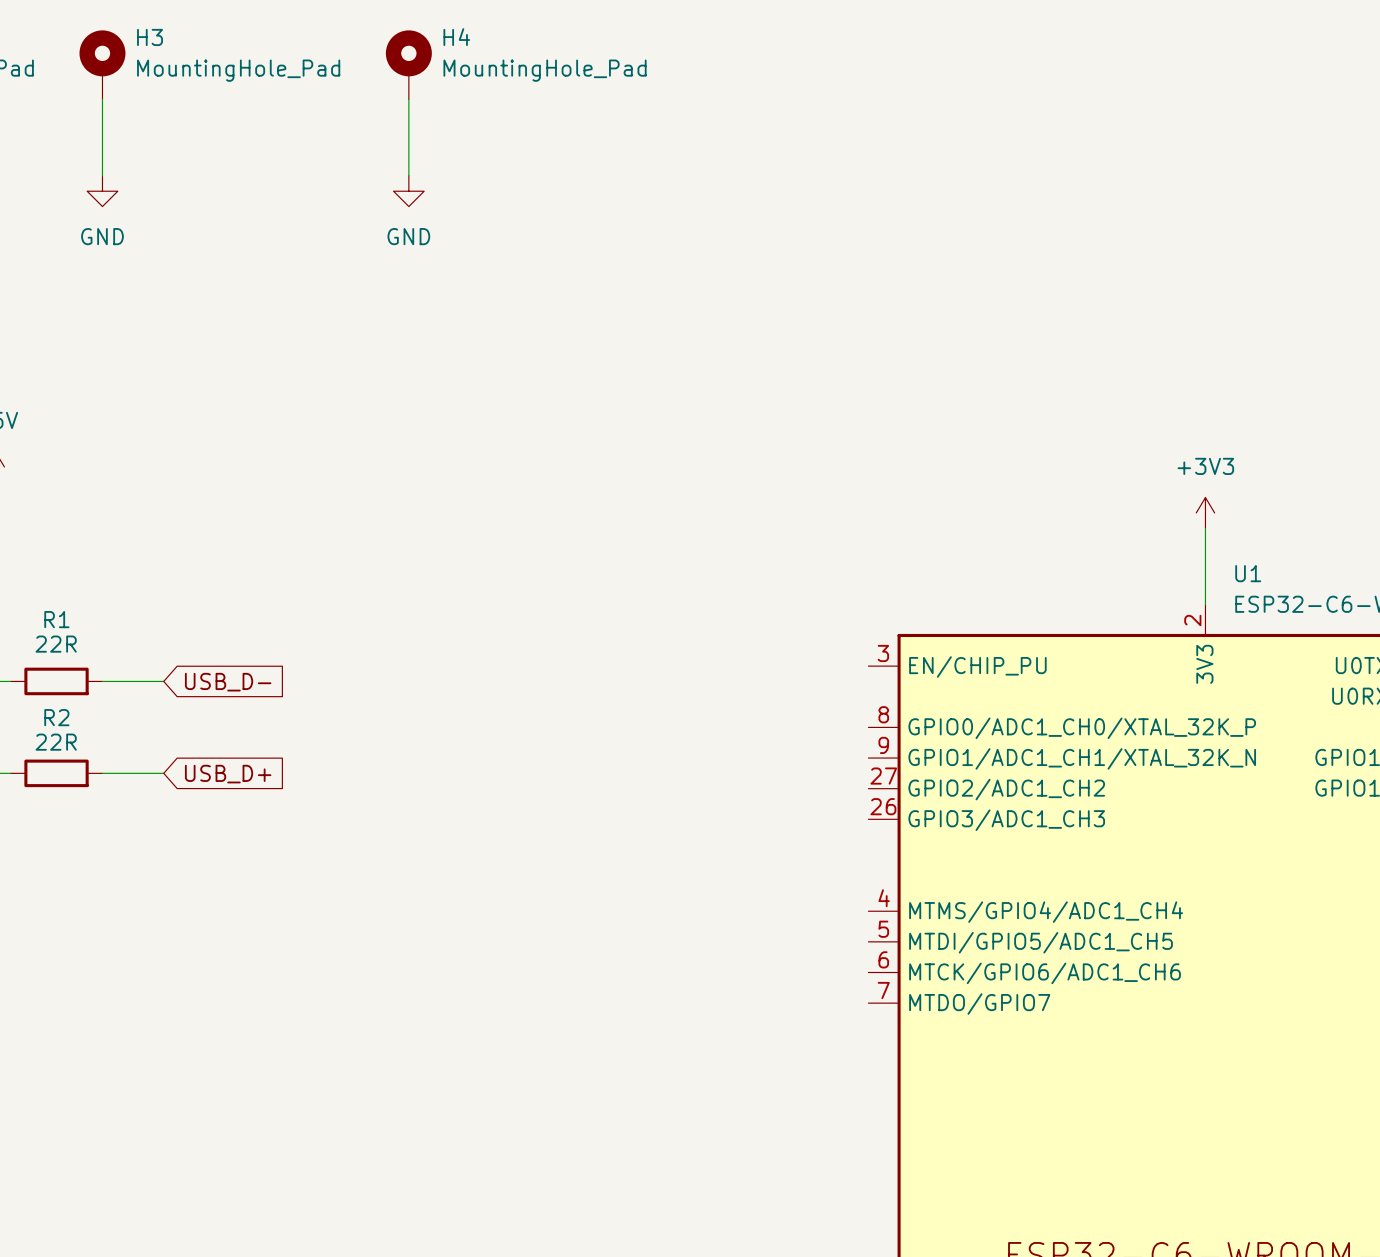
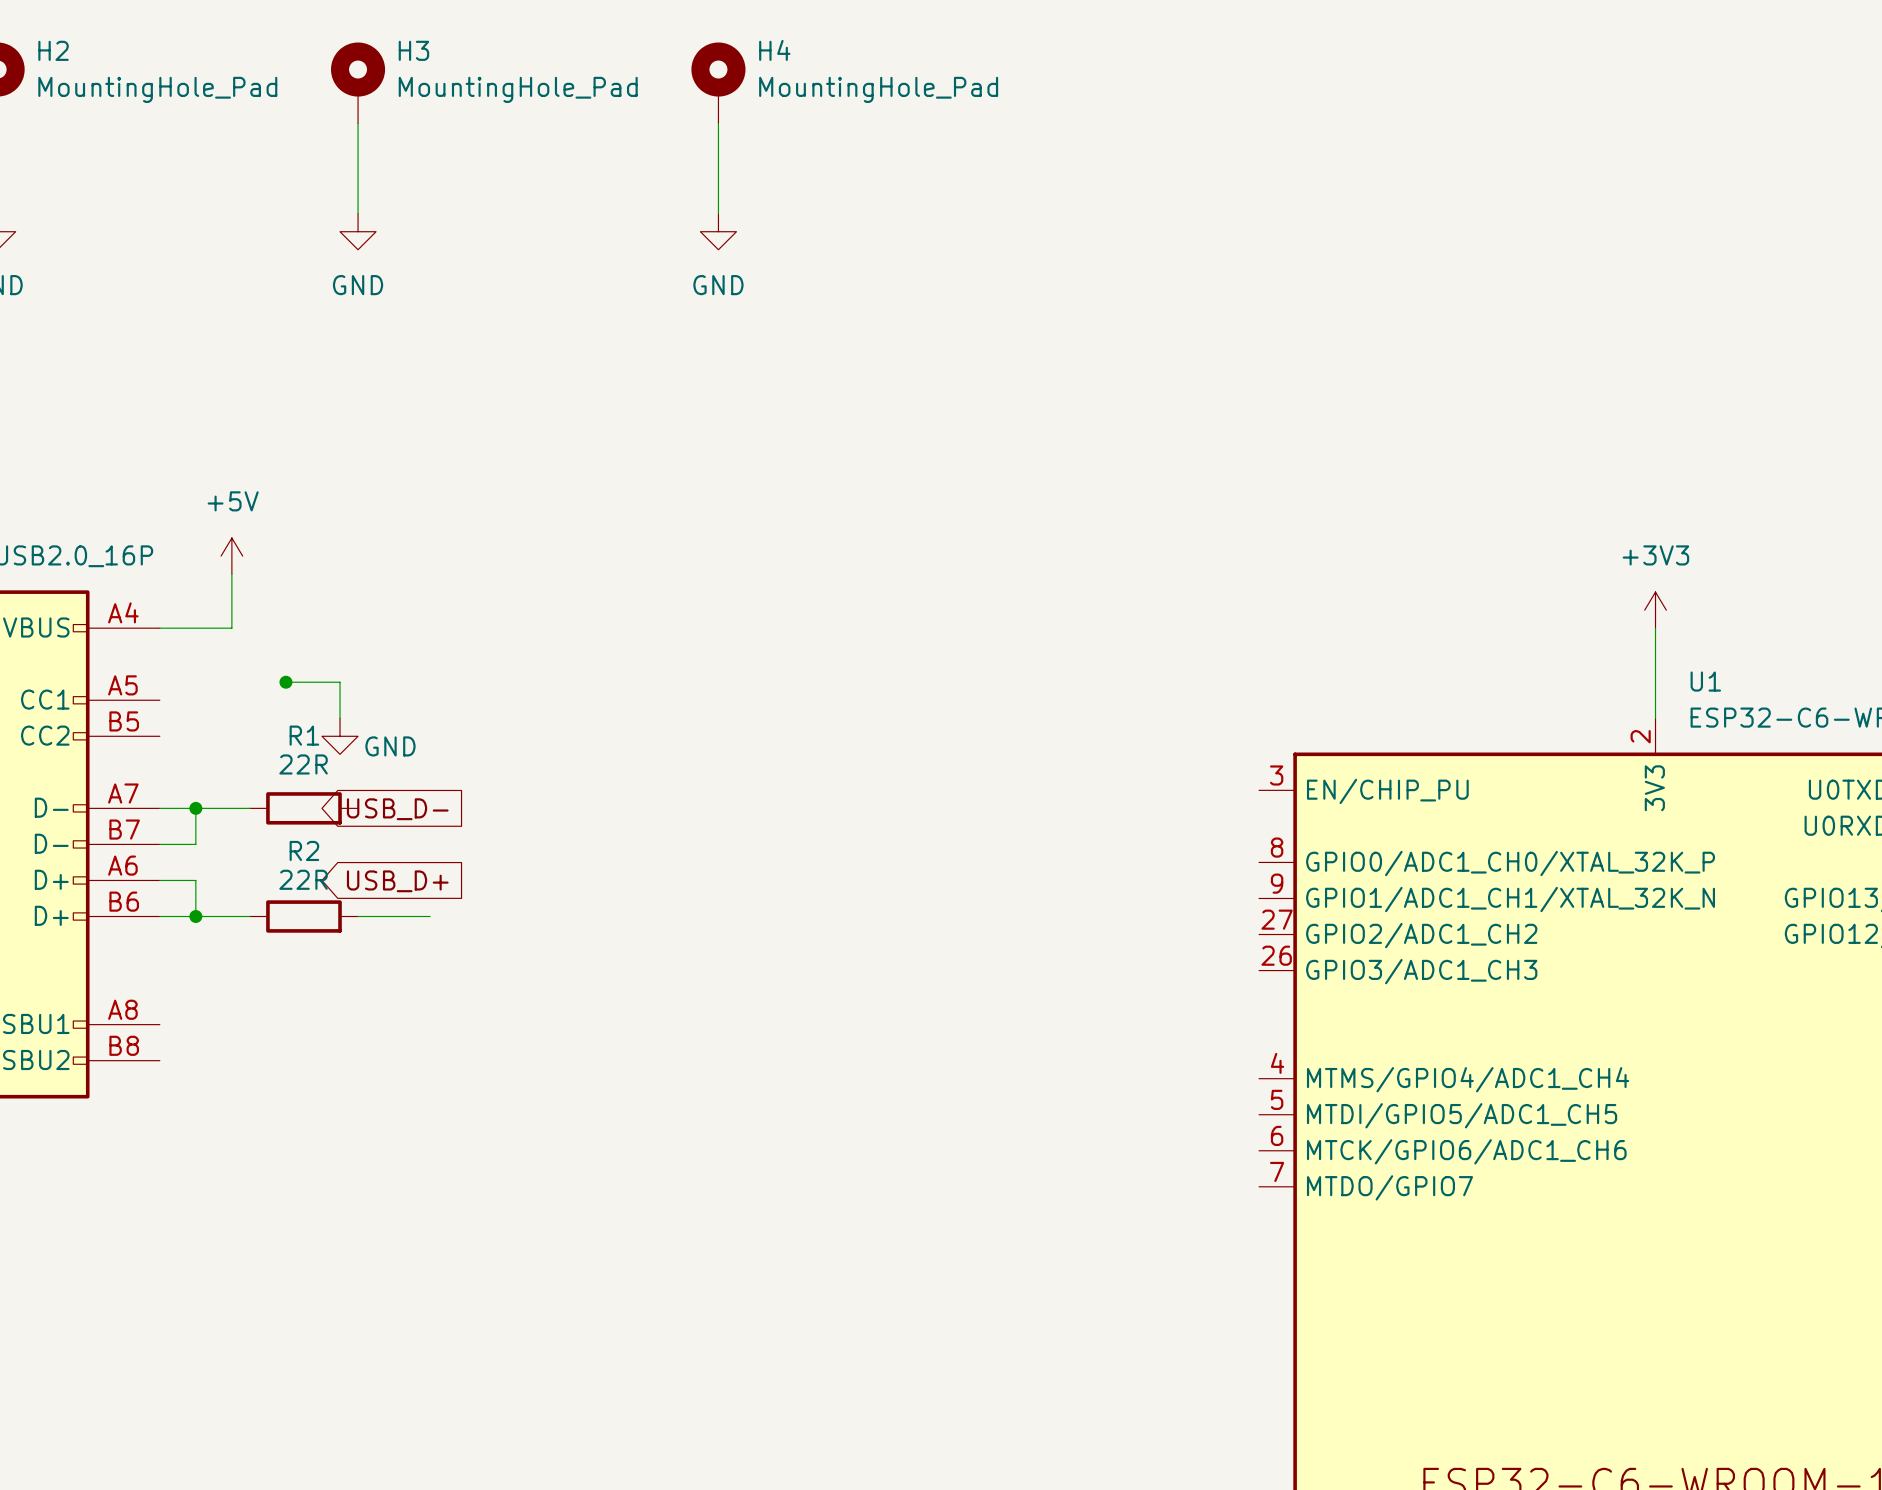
wire: none -> (285, 682) (340, 682) (340, 718)
junction: none -> (285, 682)
power symbol: none -> GND (340, 736)
wire: (102, 681) (163, 681) -> none
global label position: USB_D- (228, 682) -> USB_D- (397, 809)
global label position: USB_D+ (228, 774) -> USB_D+ (397, 881)

